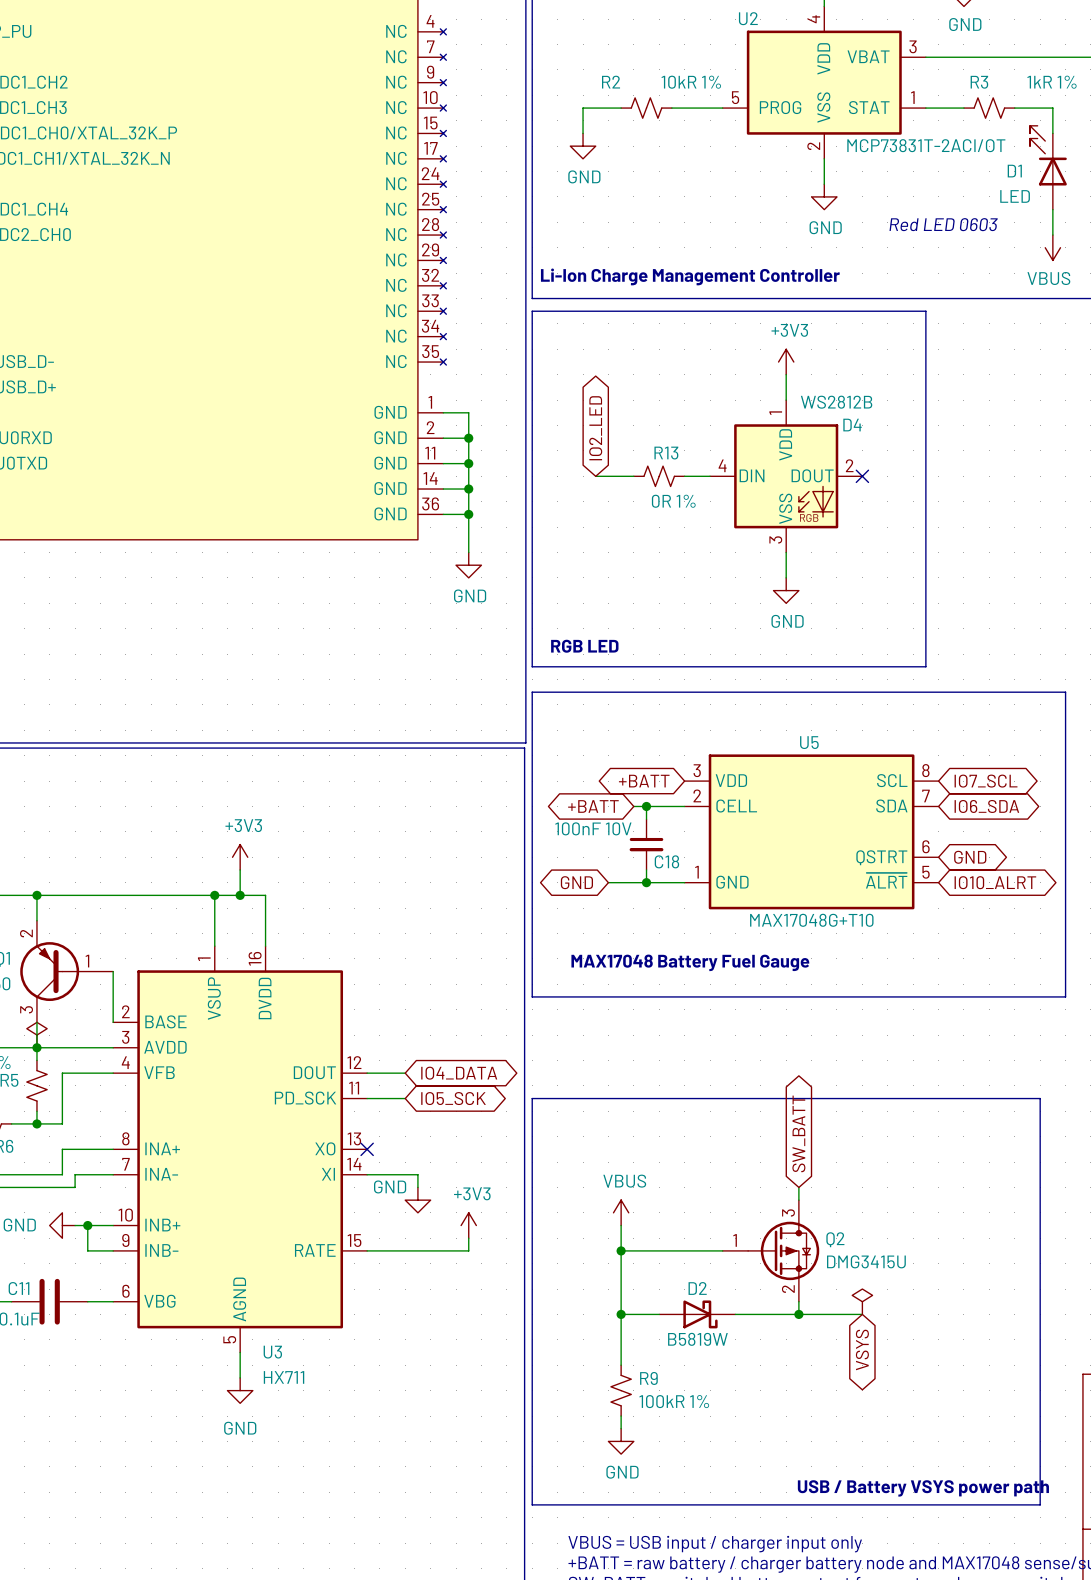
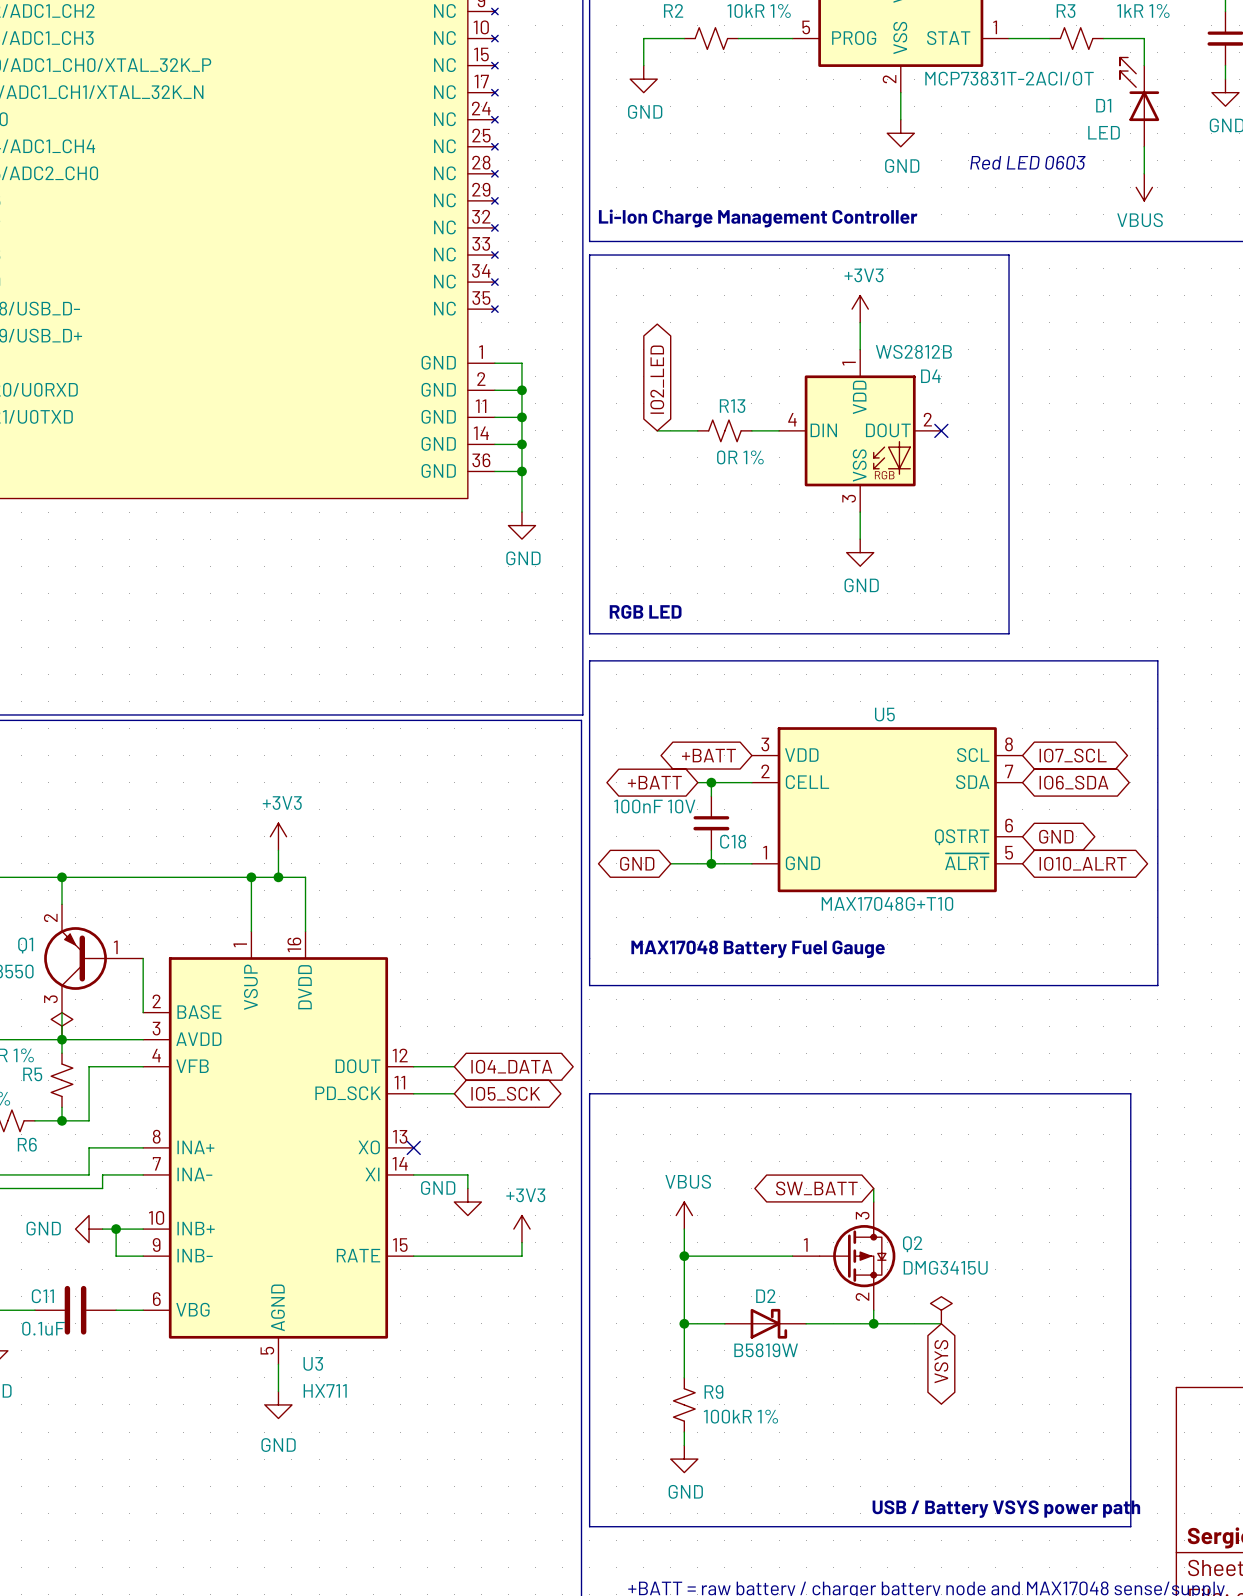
global label rotation: 0° (798, 1133) -> 90° counterclockwise (816, 1188)
text: VBUS = USB input / charger input only (715, 1544) -> none

